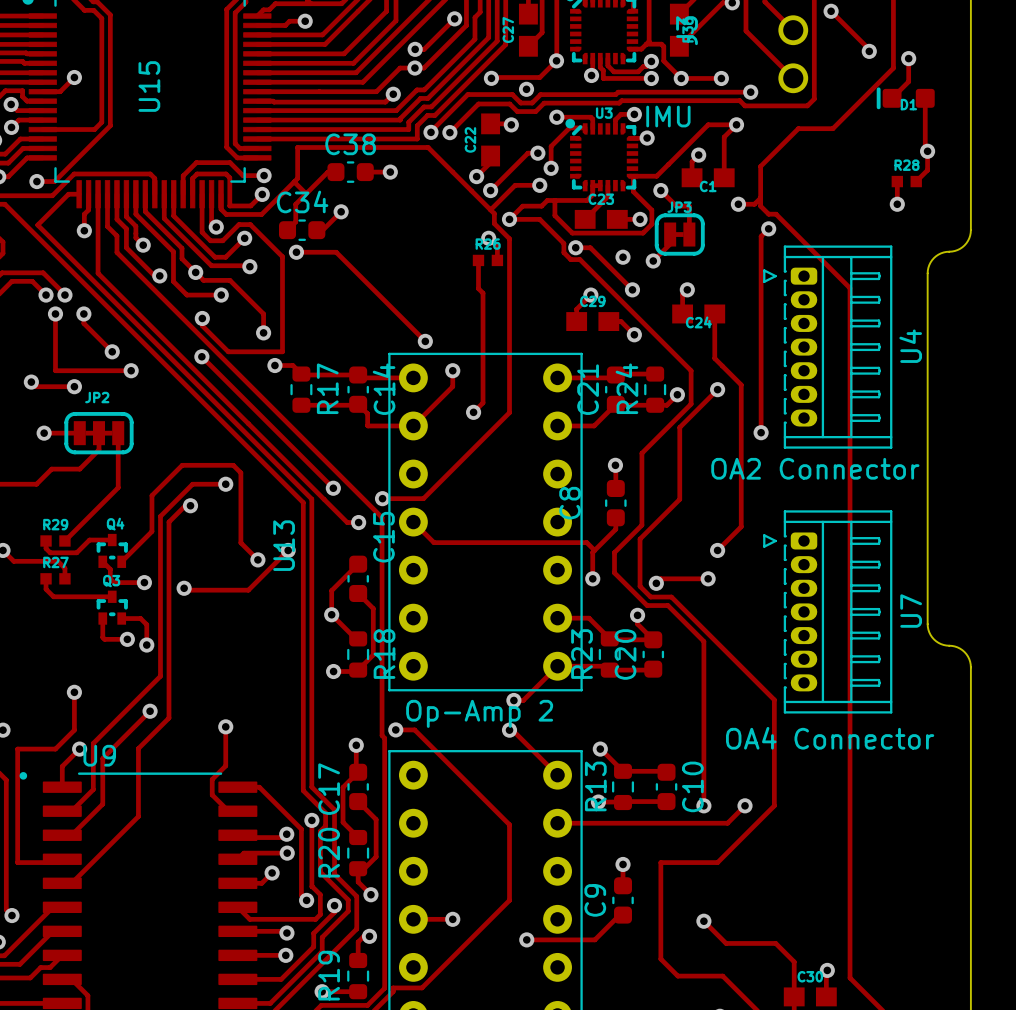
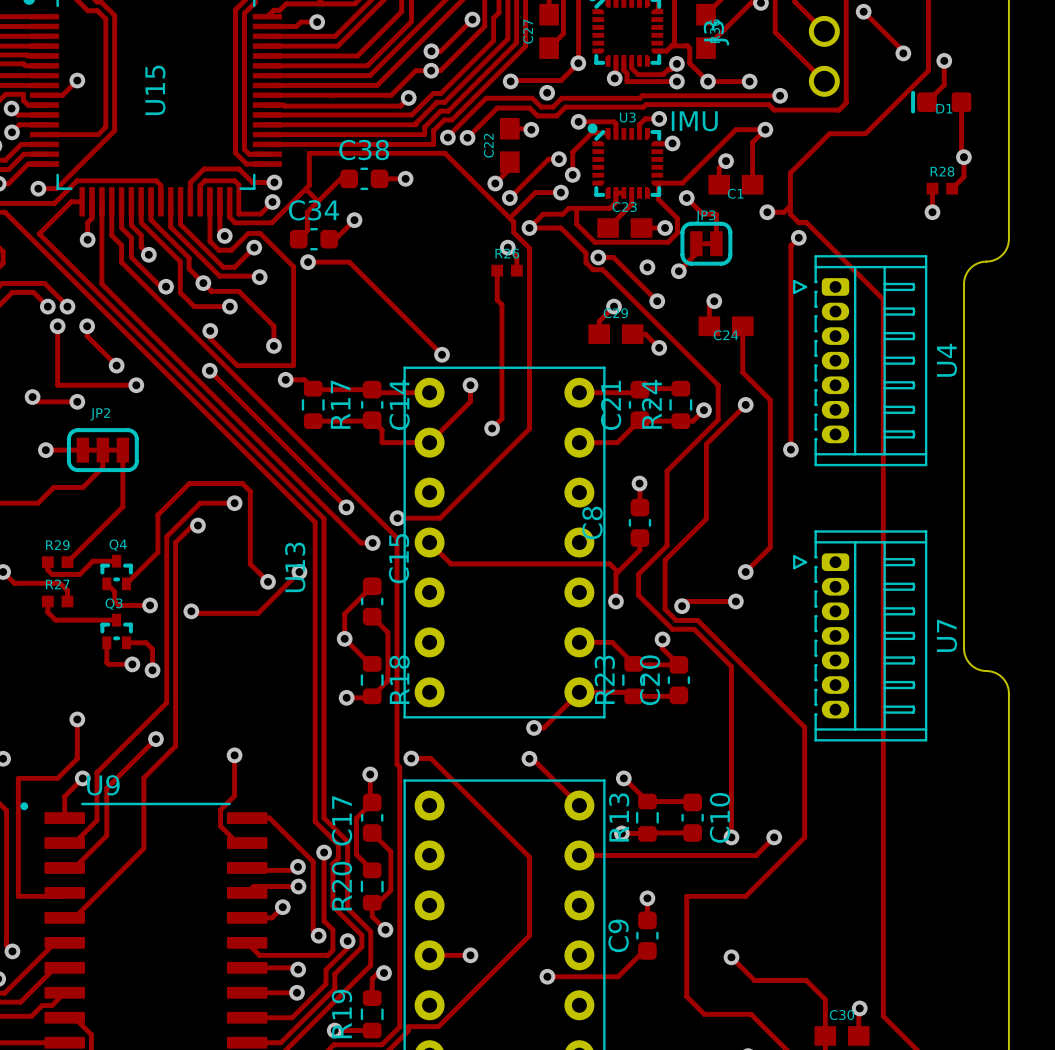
U4 text: OA2 Connector (815, 468) -> none
U13 text: Op-Amp 2 (479, 713) -> none
U7 text: OA4 Connector (830, 738) -> none

